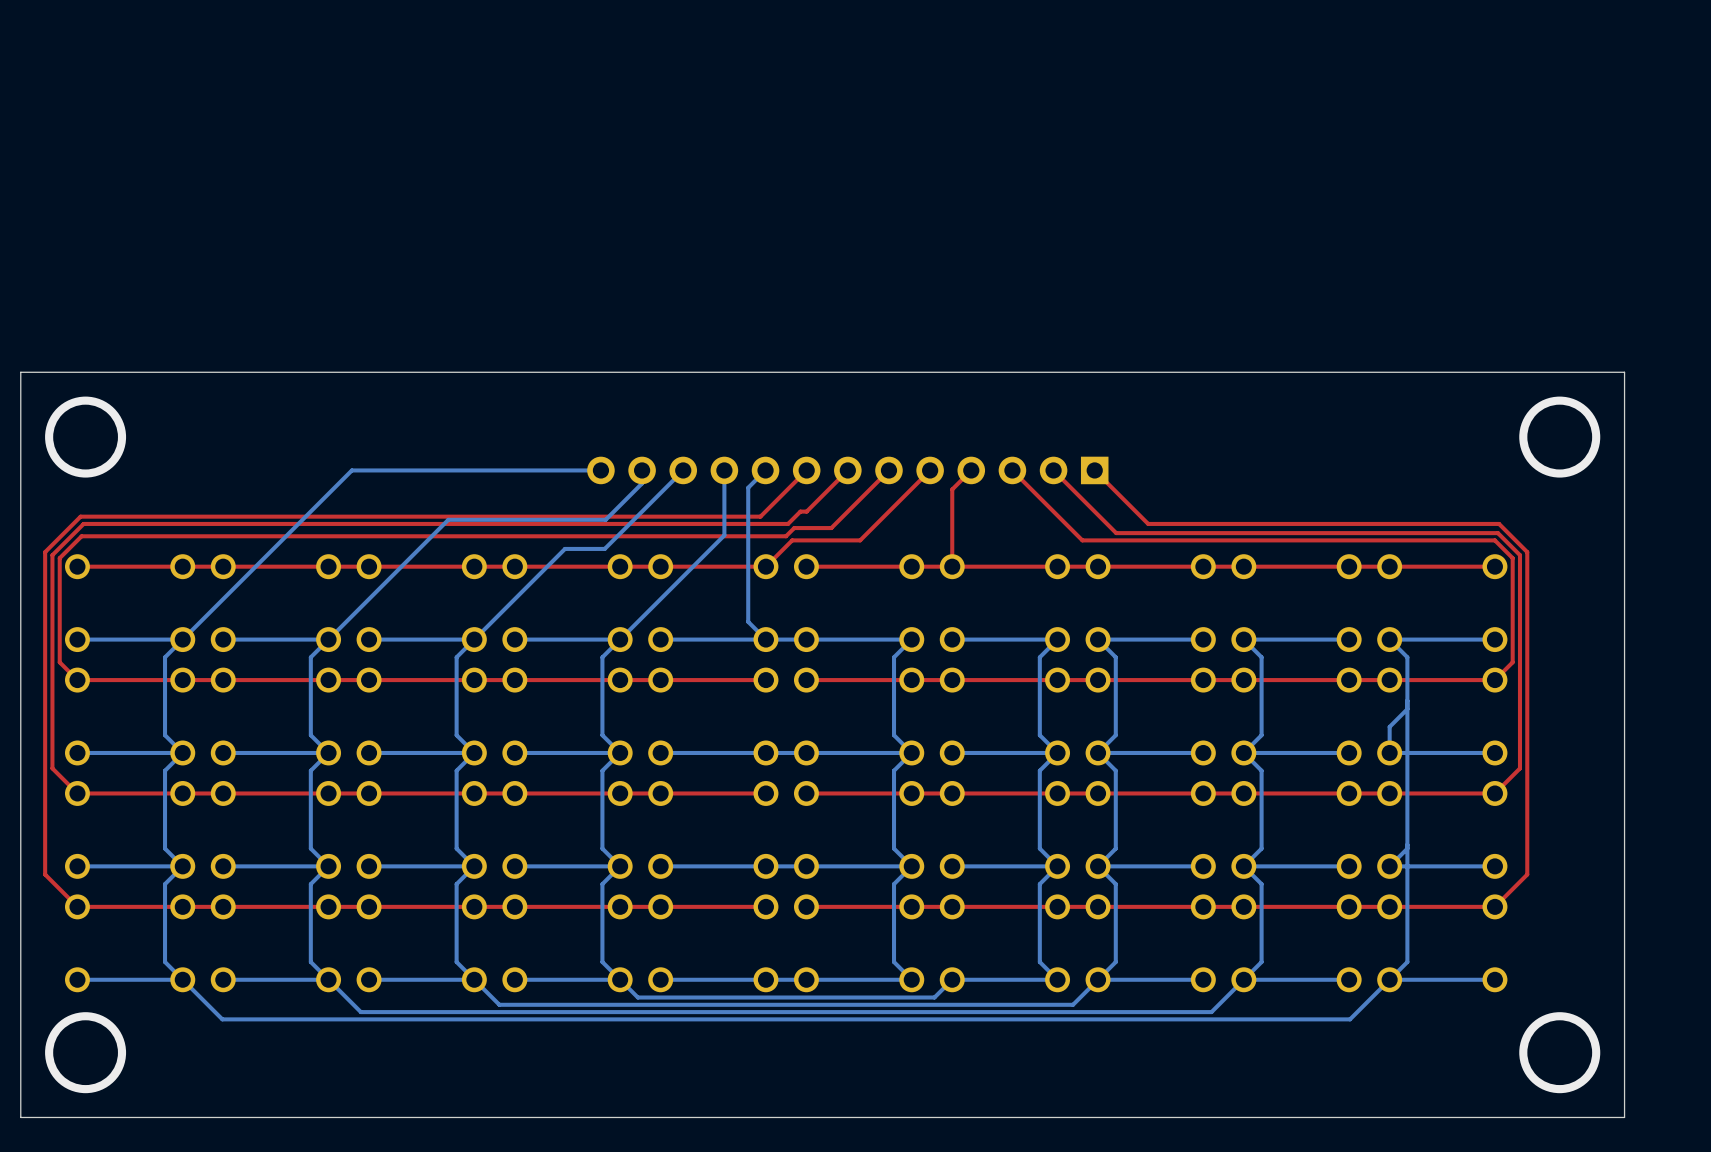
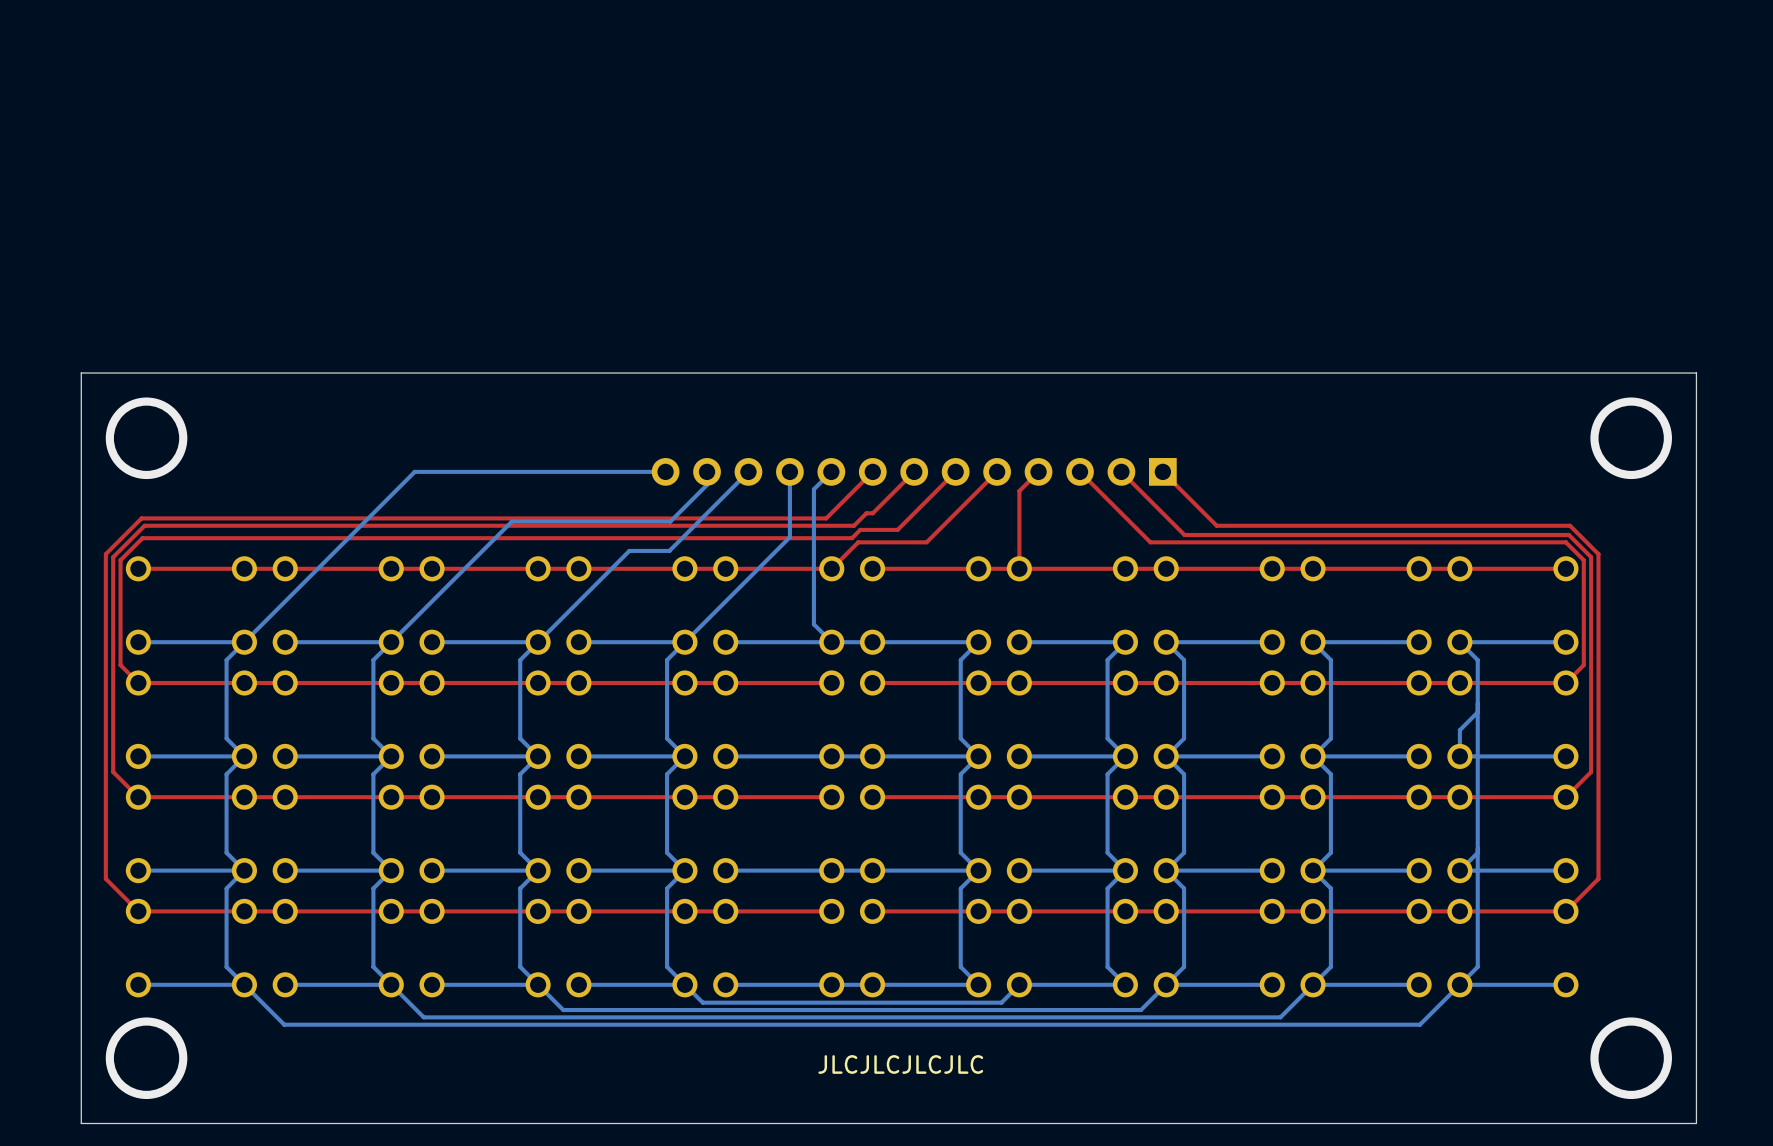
text: none -> JLCJLCJLCJLC (900, 1064)

